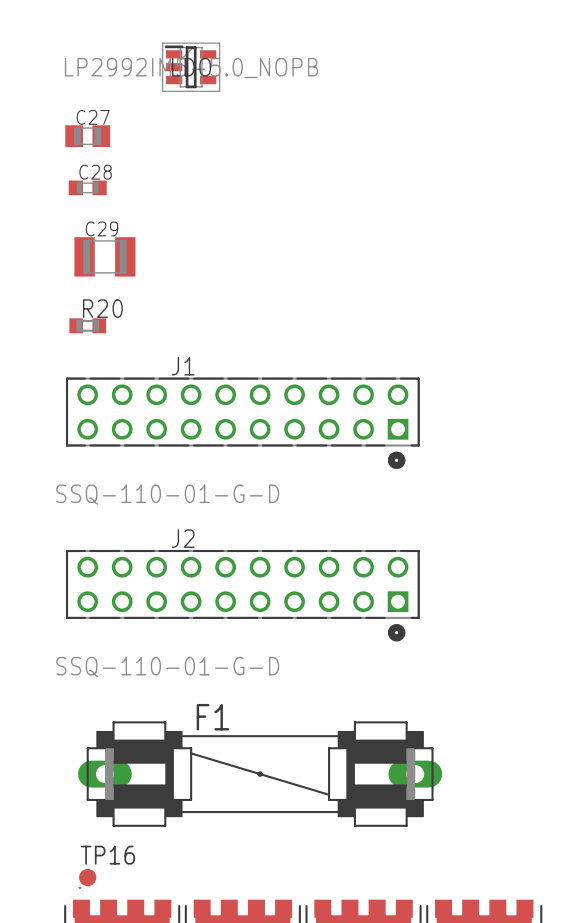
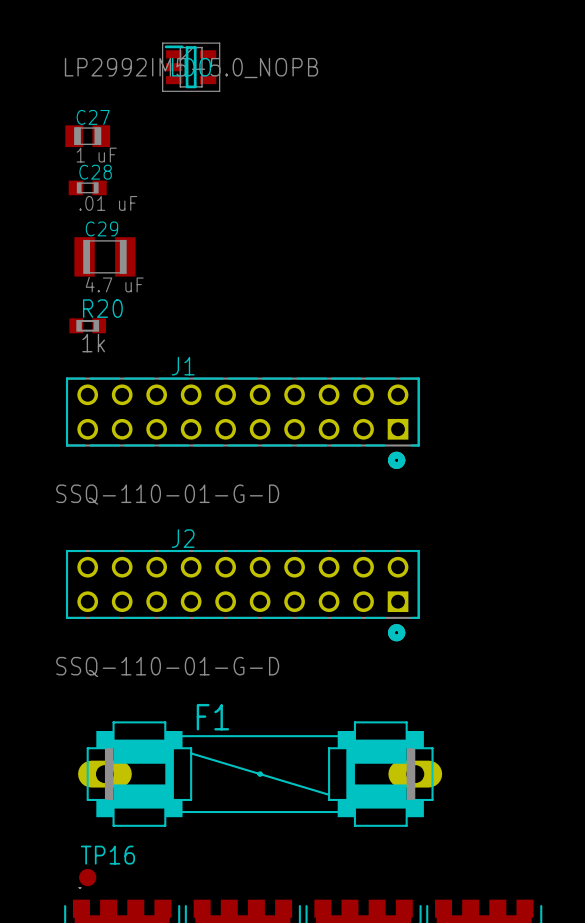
C27 value: none -> 1 uF (96, 155)
C28 value: none -> .01 uF (108, 203)
C29 value: none -> 4.7 uF (114, 284)
R20 value: none -> 1k (93, 343)

